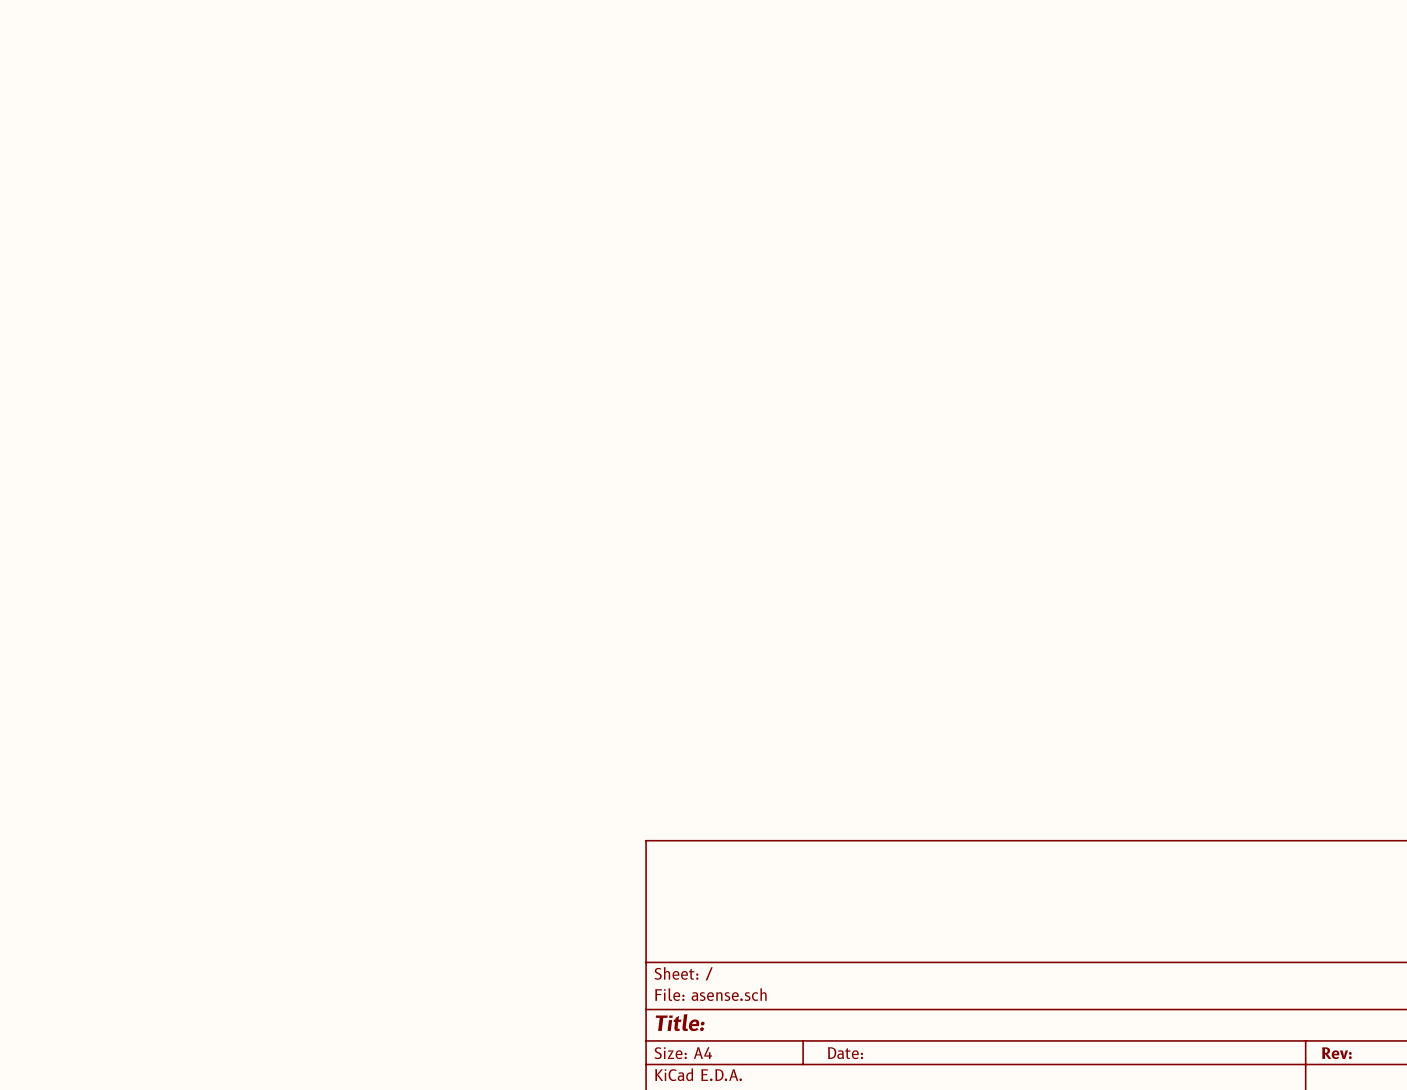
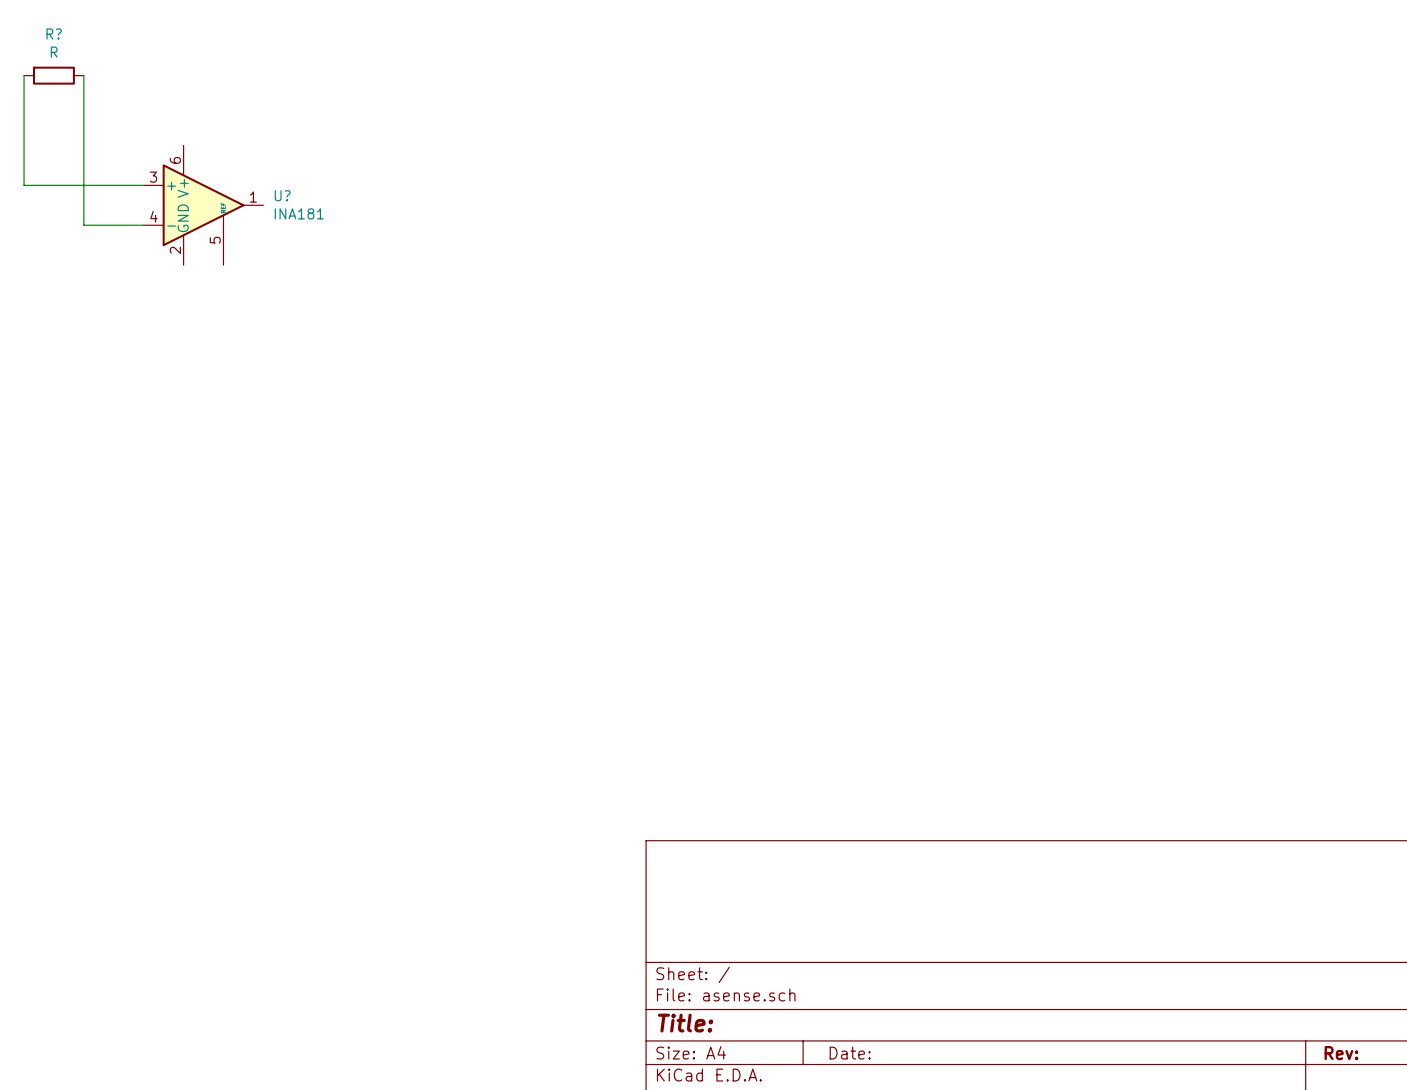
wire: none -> (24, 75) (24, 185) (143, 185)
R?: none -> R (53, 75)
wire: none -> (83, 75) (83, 225) (143, 225)
U?: none -> INA181 (203, 205)

